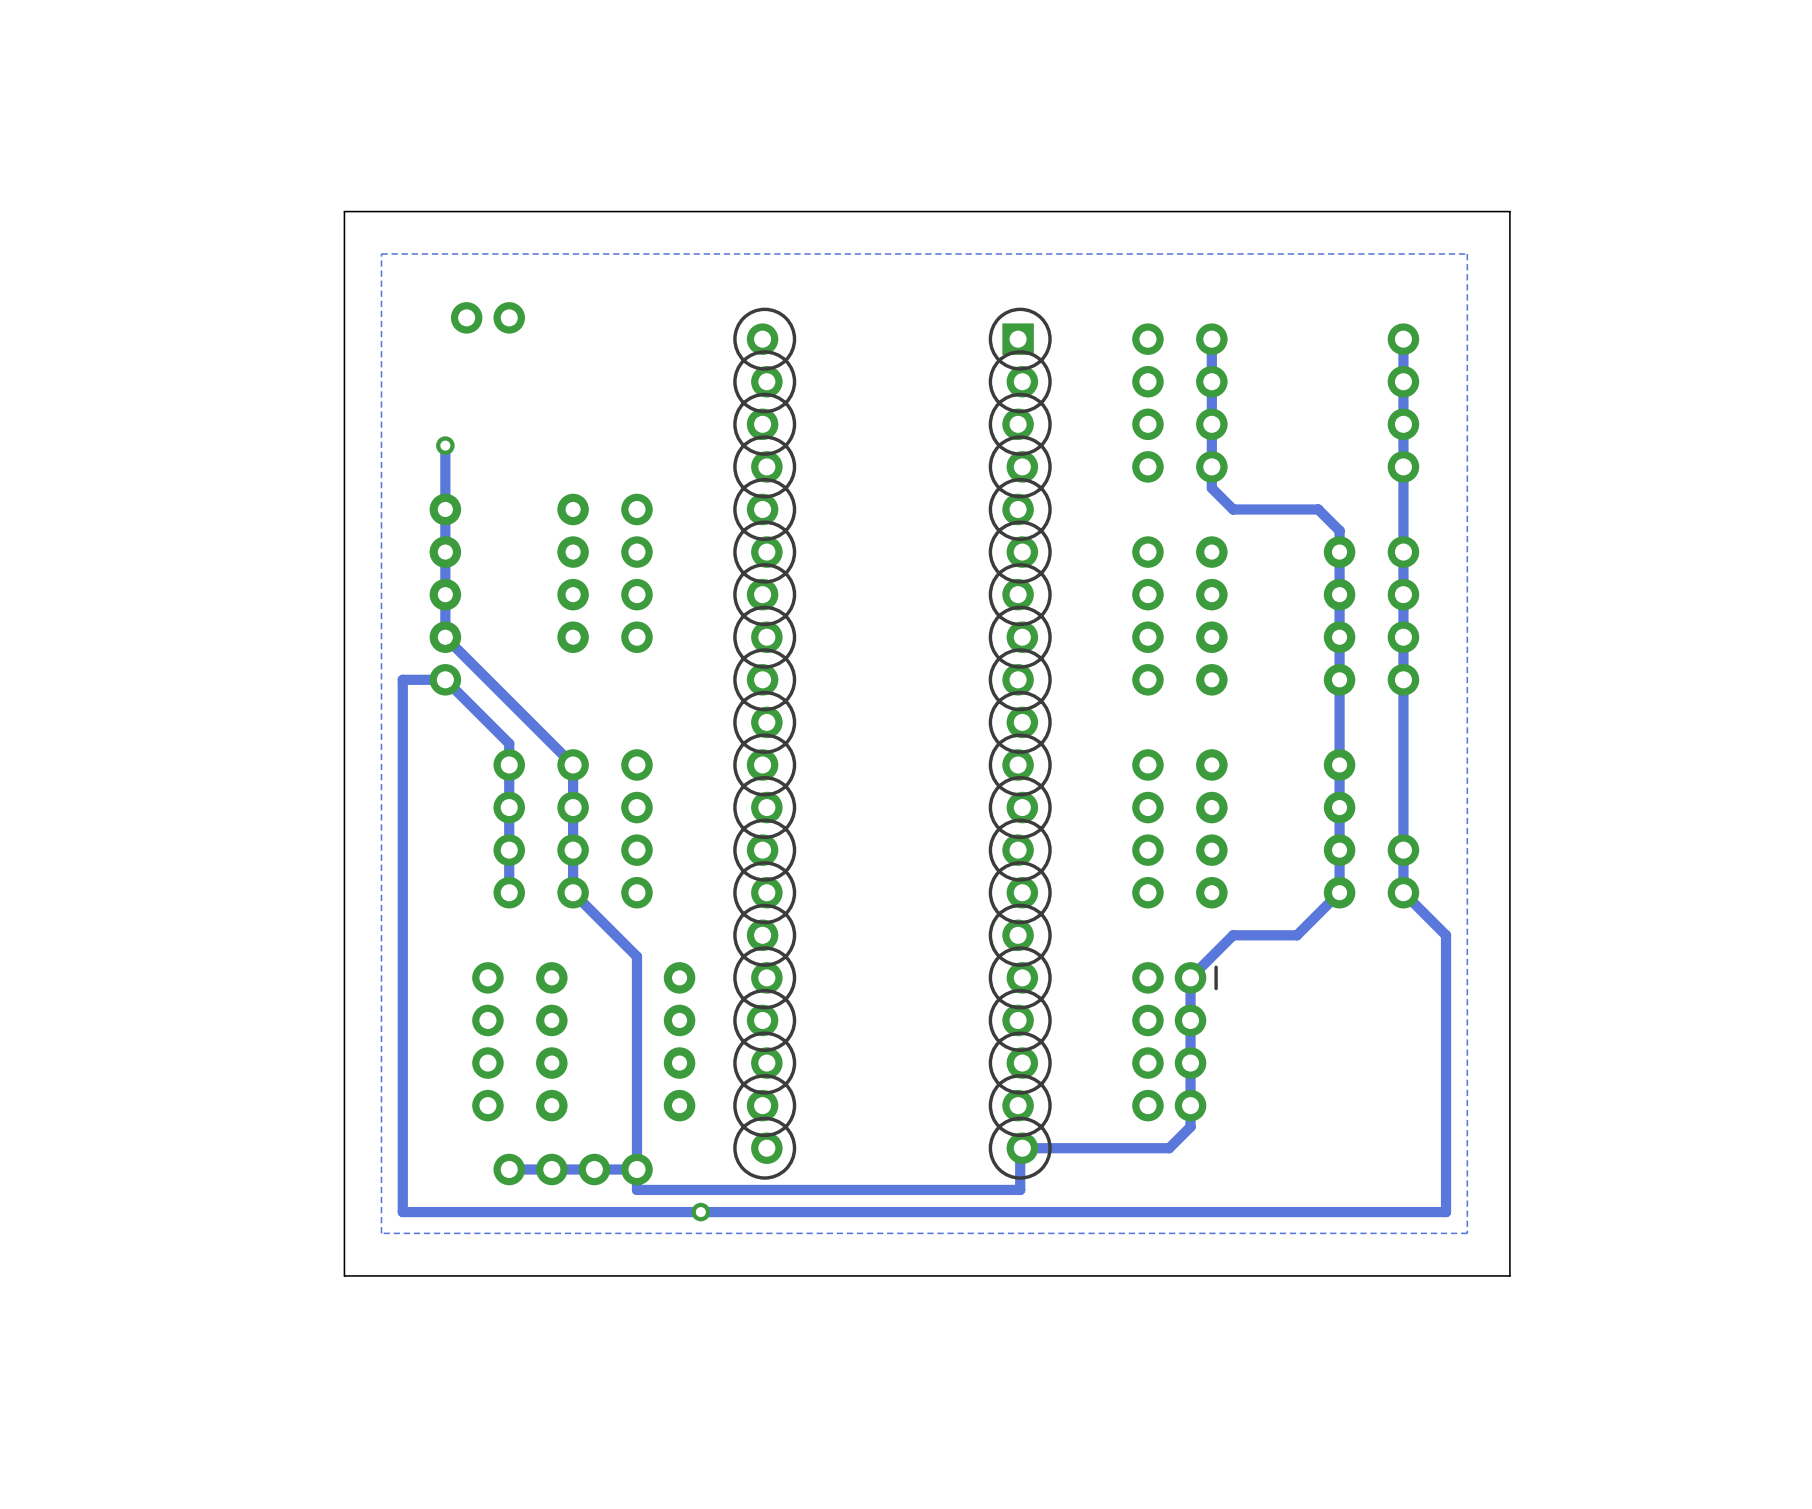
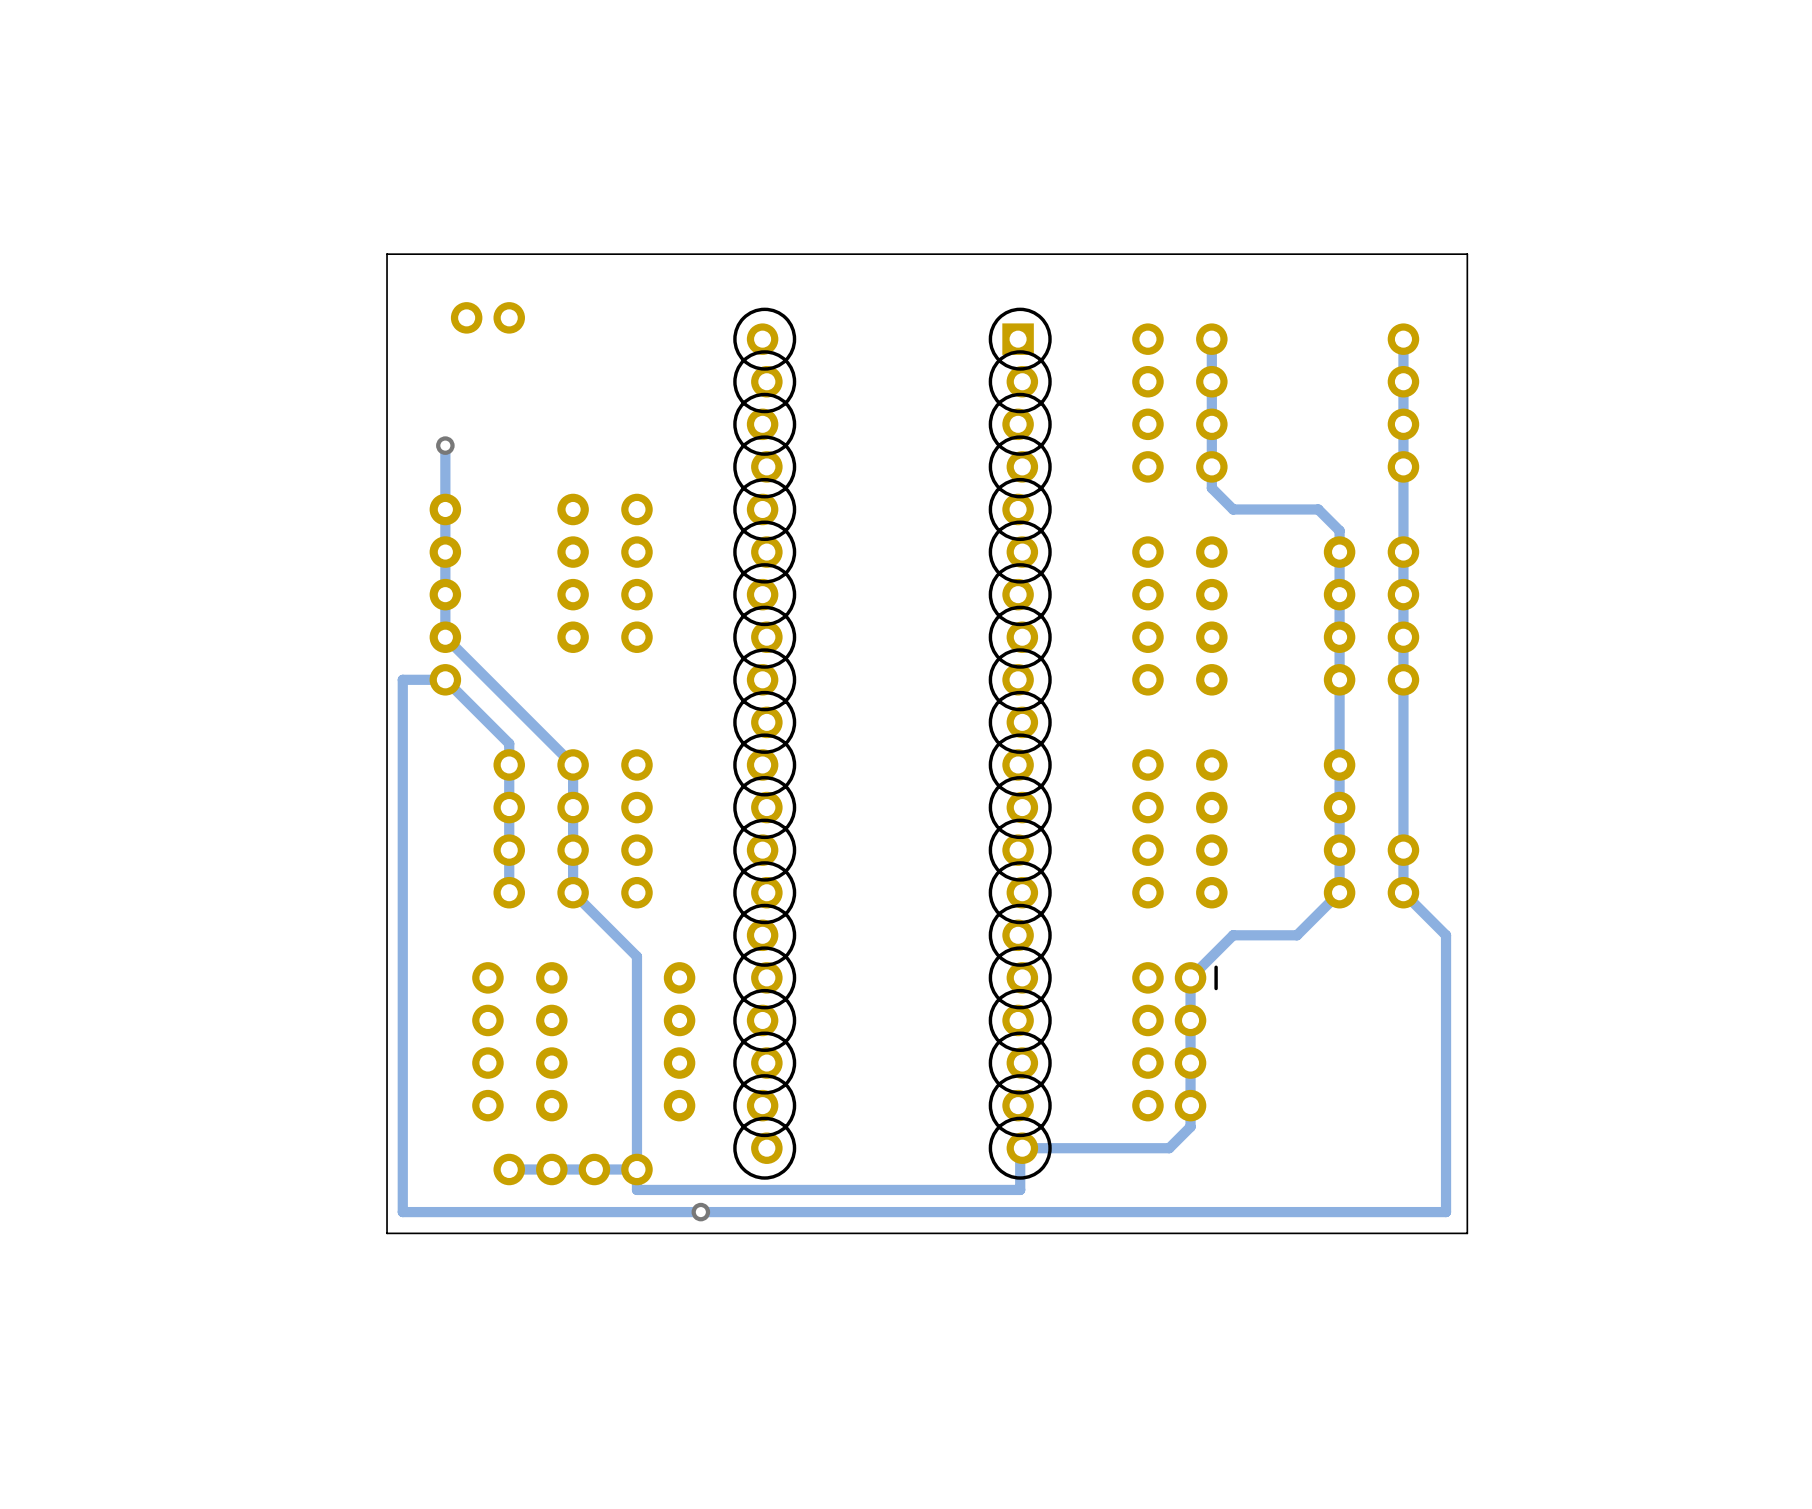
board edge: (1509, 211) (344, 211) (344, 1275) (1509, 1275) (1509, 211) -> (1467, 254) (1467, 1233) (387, 1233) (387, 254) (1467, 254)
zone outline: (1467, 253) (1467, 1233) (381, 1233) (381, 253) (1467, 253) -> none

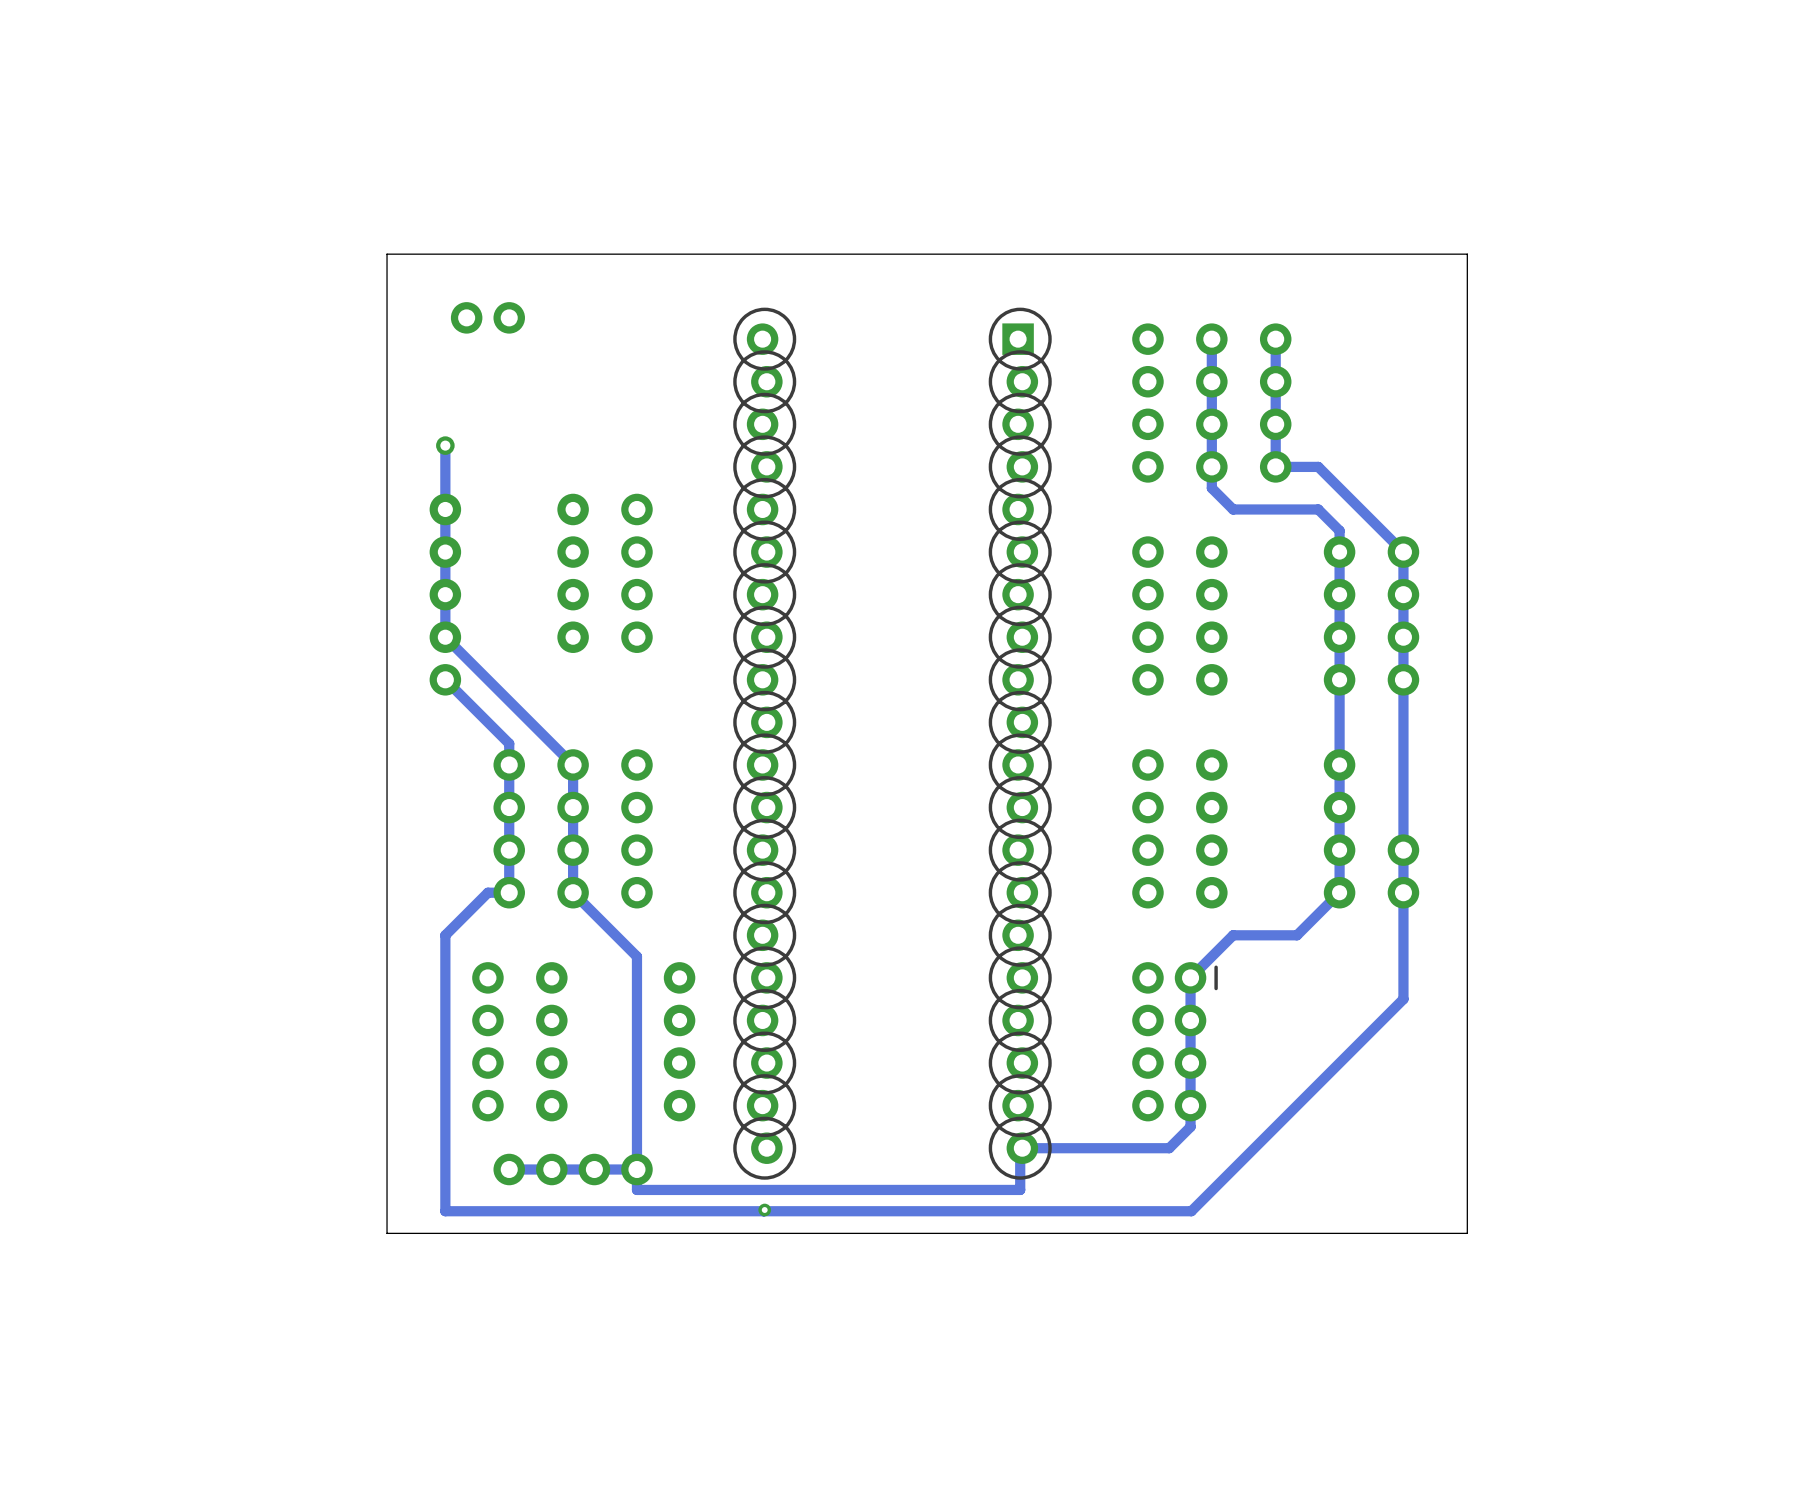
track: (1403, 339) (1403, 552) -> (1275, 339) (1275, 466) (1318, 466) (1403, 552)
part position: (1403, 403) -> (1275, 403)
track: (445, 679) (402, 679) (402, 1212) (1446, 1212) (1446, 935) (1403, 892) -> (763, 1211) (1191, 1211) (1403, 999) (1403, 892)
track: none -> (509, 892) (487, 892) (445, 935) (445, 1211) (764, 1210)
via: none -> (764, 1210)
via: (700, 1212) -> none

